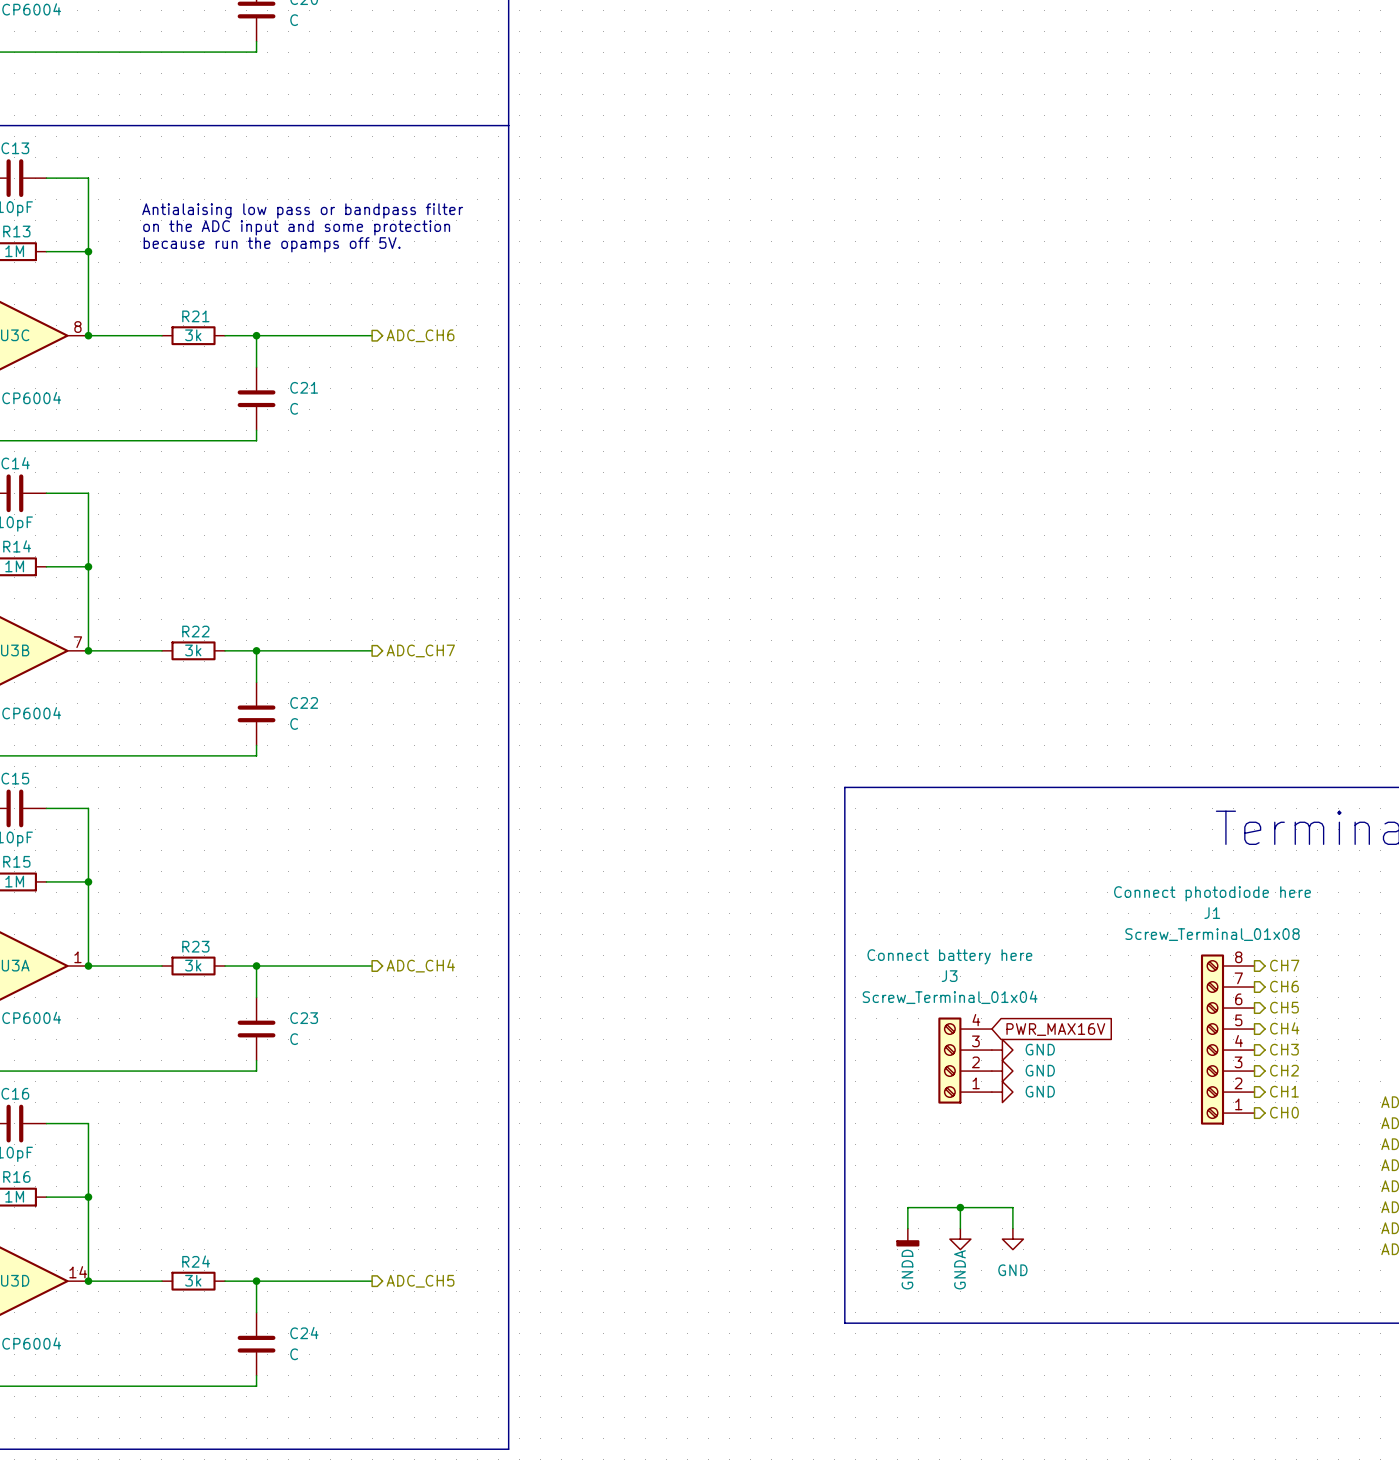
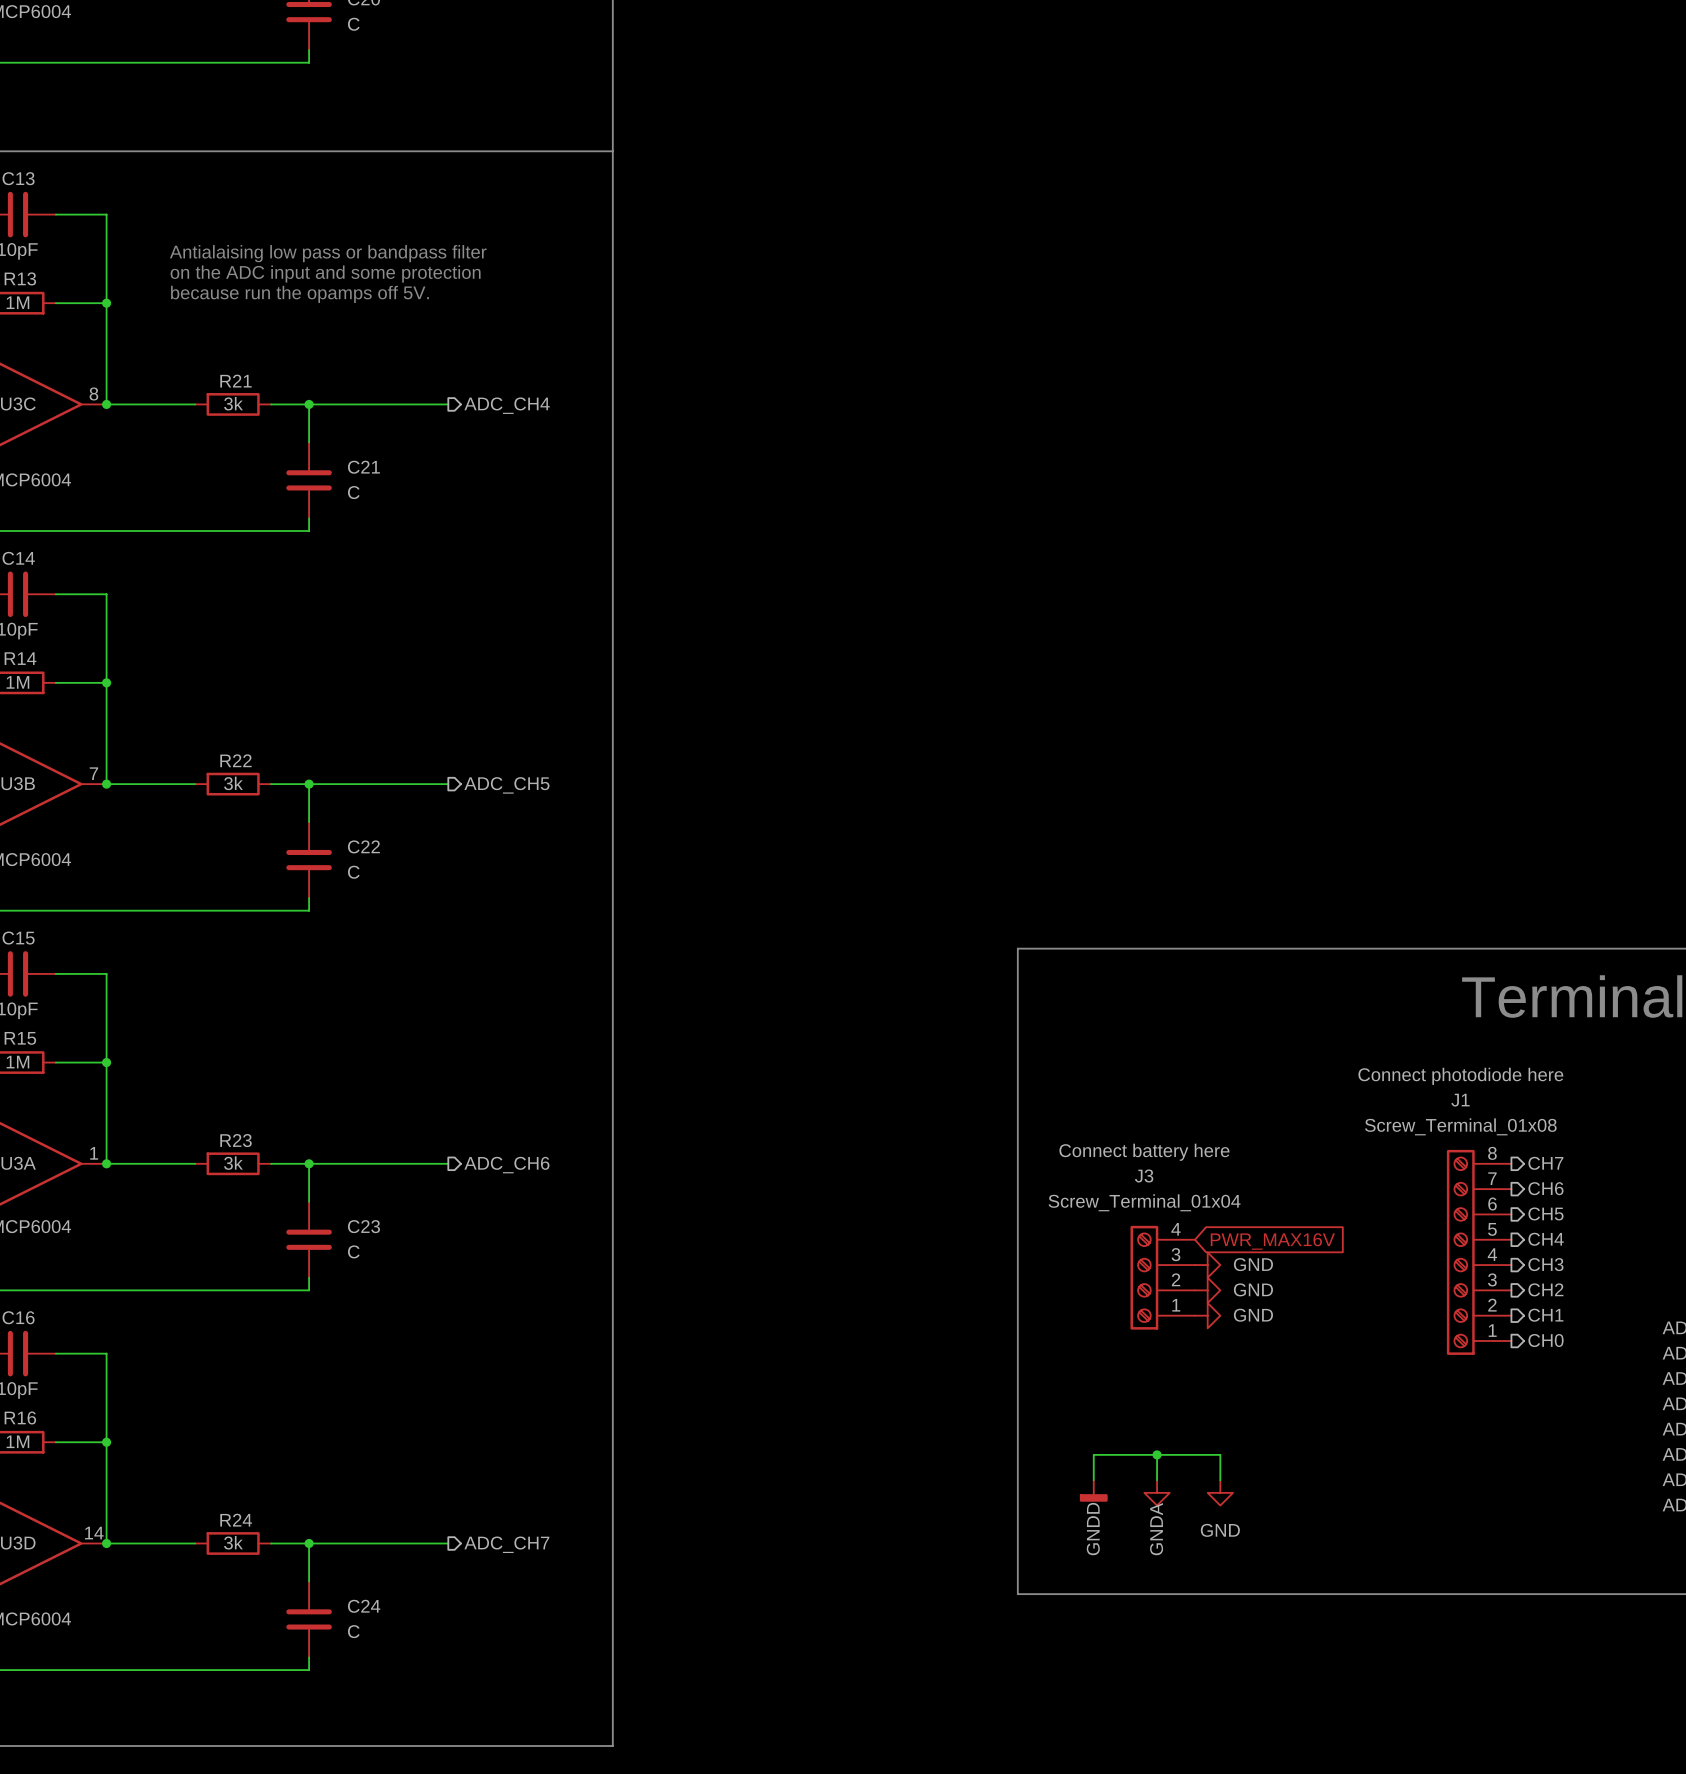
hierarchical label: ADC_CH6 (420, 335) -> ADC_CH4 (507, 405)
hierarchical label: ADC_CH7 (420, 650) -> ADC_CH5 (506, 785)
hierarchical label: ADC_CH4 (420, 965) -> ADC_CH6 (506, 1165)
hierarchical label: ADC_CH5 (420, 1281) -> ADC_CH7 (506, 1544)

